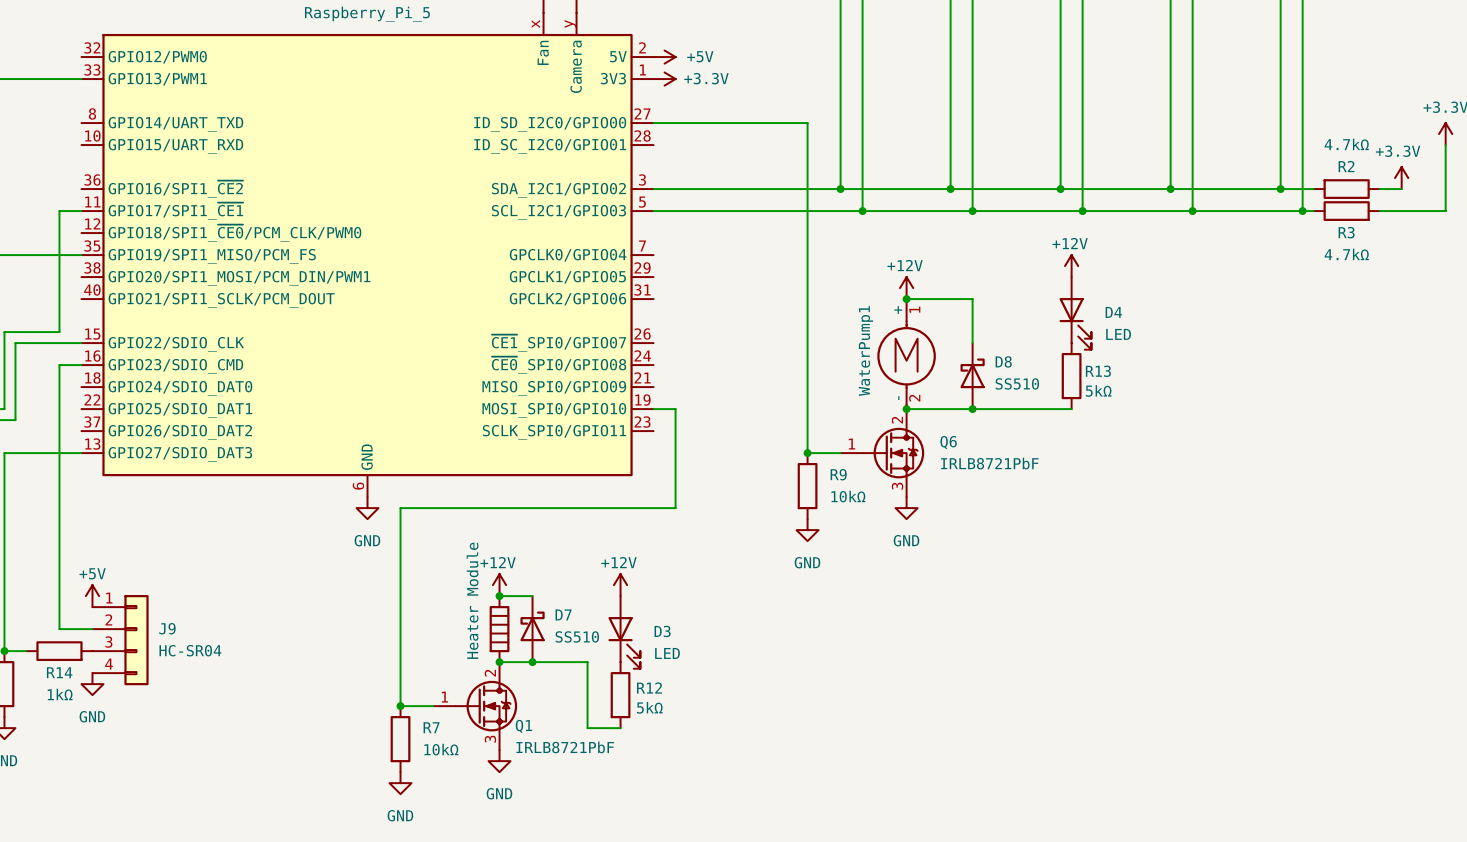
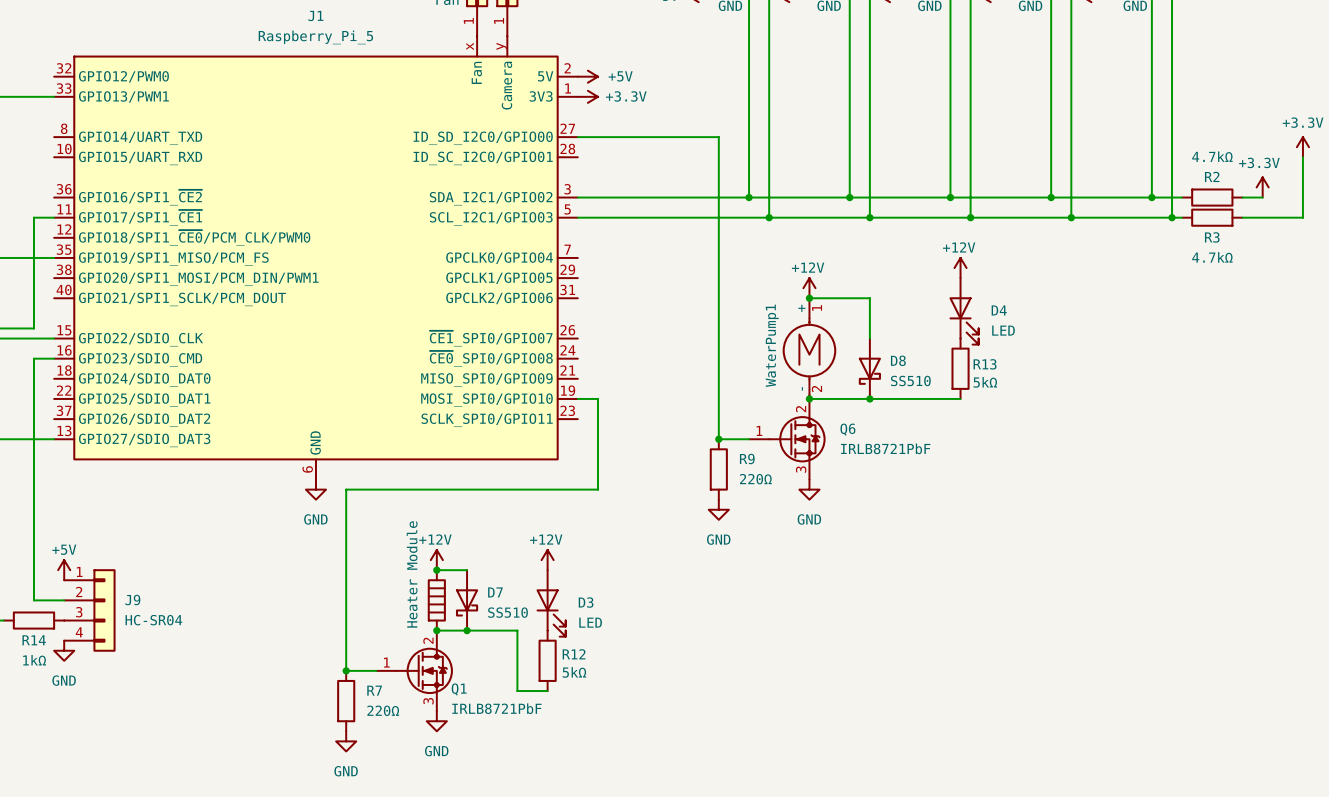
D8 rotation: 0° (972, 373) -> 180° (869, 371)
R9 value: 10kΩ (848, 496) -> 220Ω (755, 479)
D7 rotation: 0° (532, 626) -> 180° (467, 602)
R7 value: 10kΩ (441, 749) -> 220Ω (383, 710)

